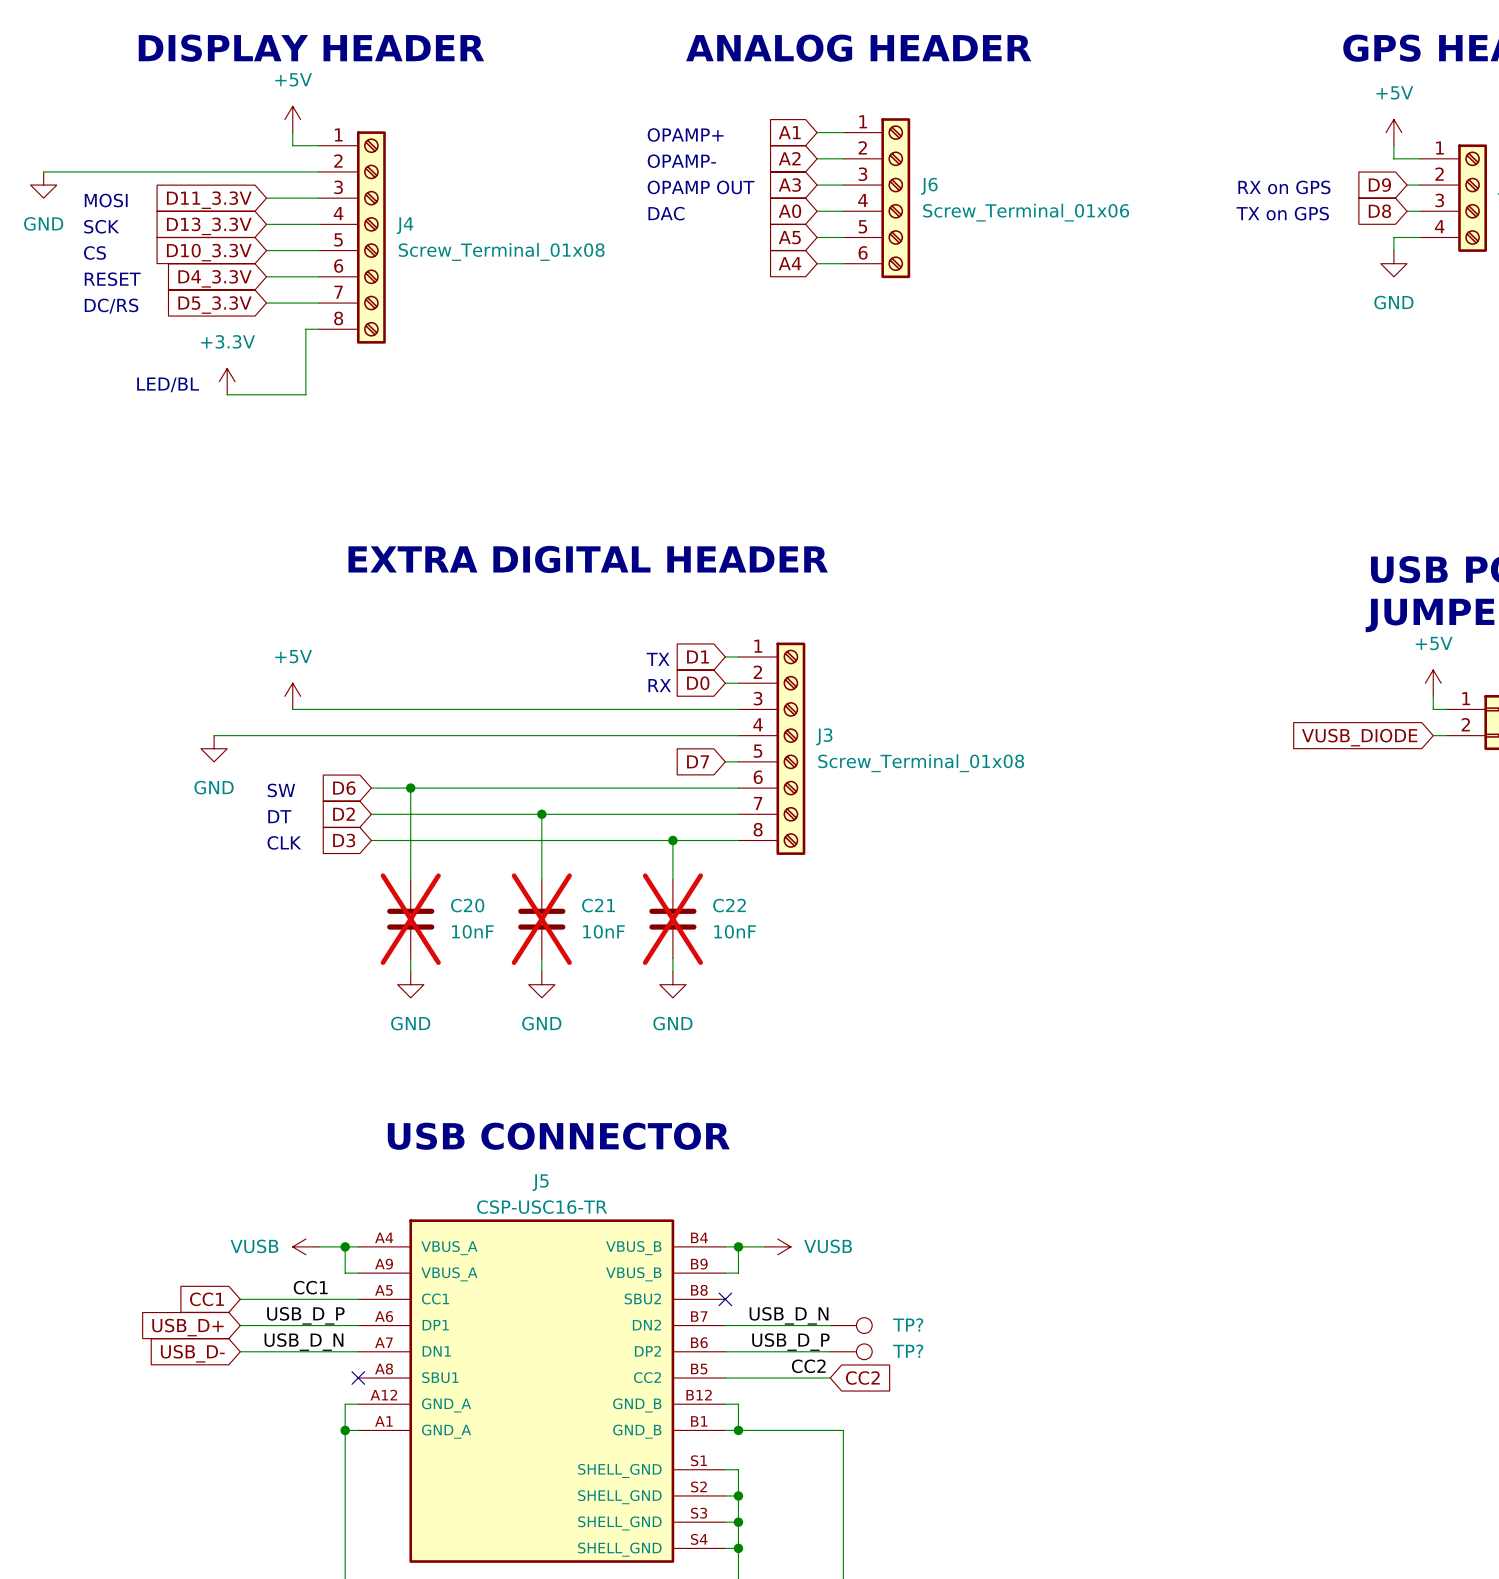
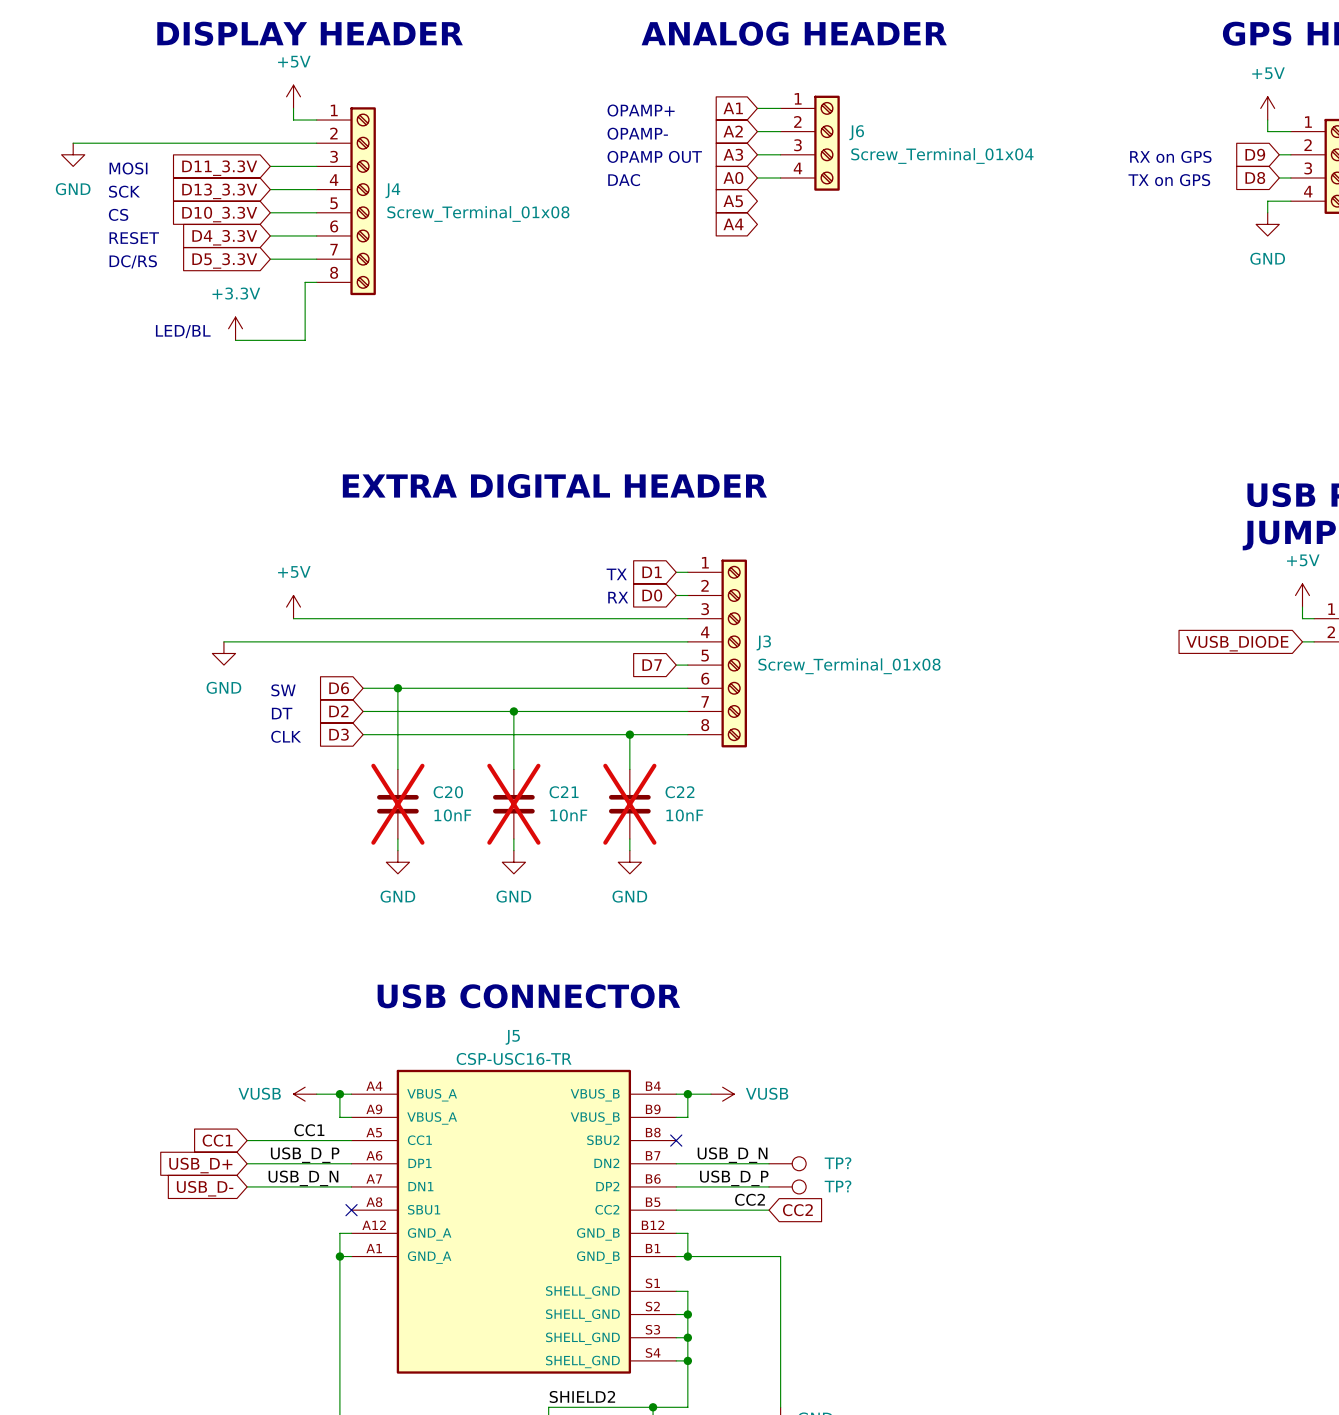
J6: none -> Screw_Terminal_01x04 (810, 143)
J6: Screw_Terminal_01x06 (876, 198) -> none
wire: (817, 237) (843, 237) -> none
wire: (817, 263) (843, 263) -> none

